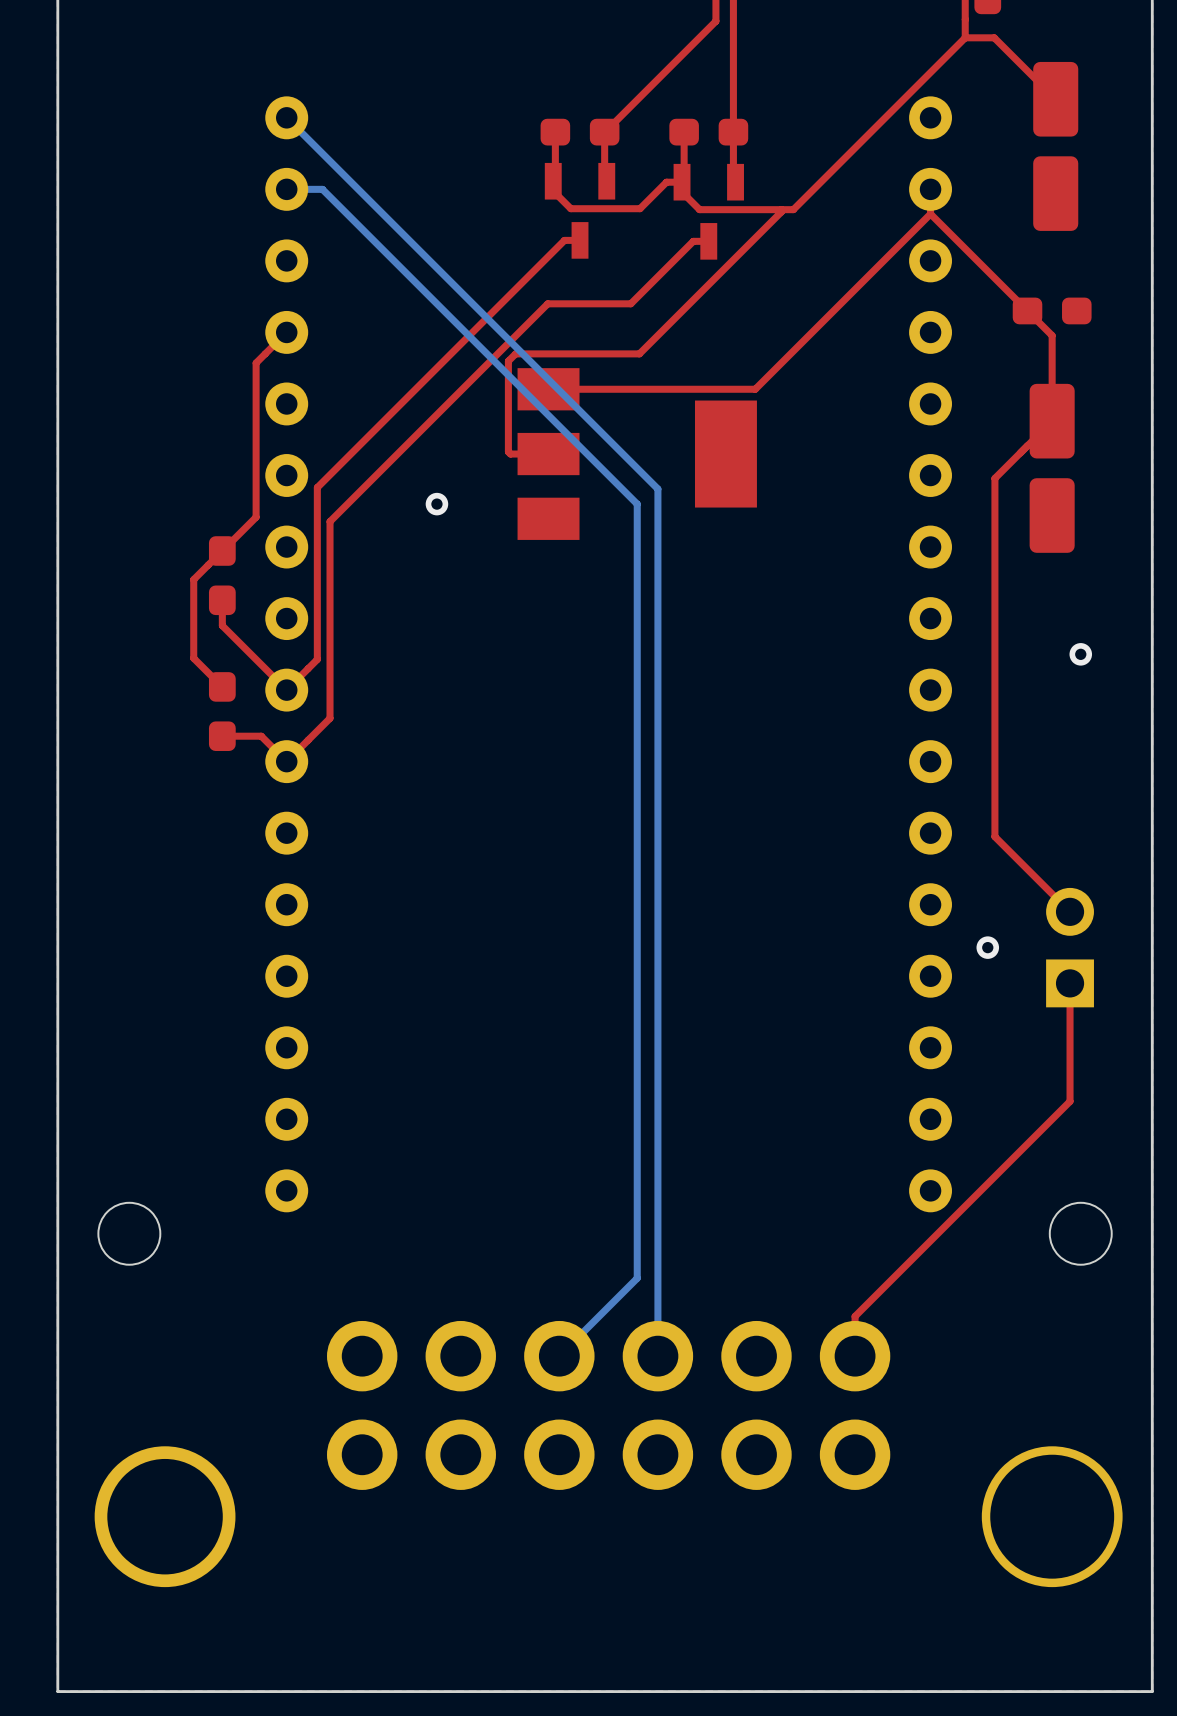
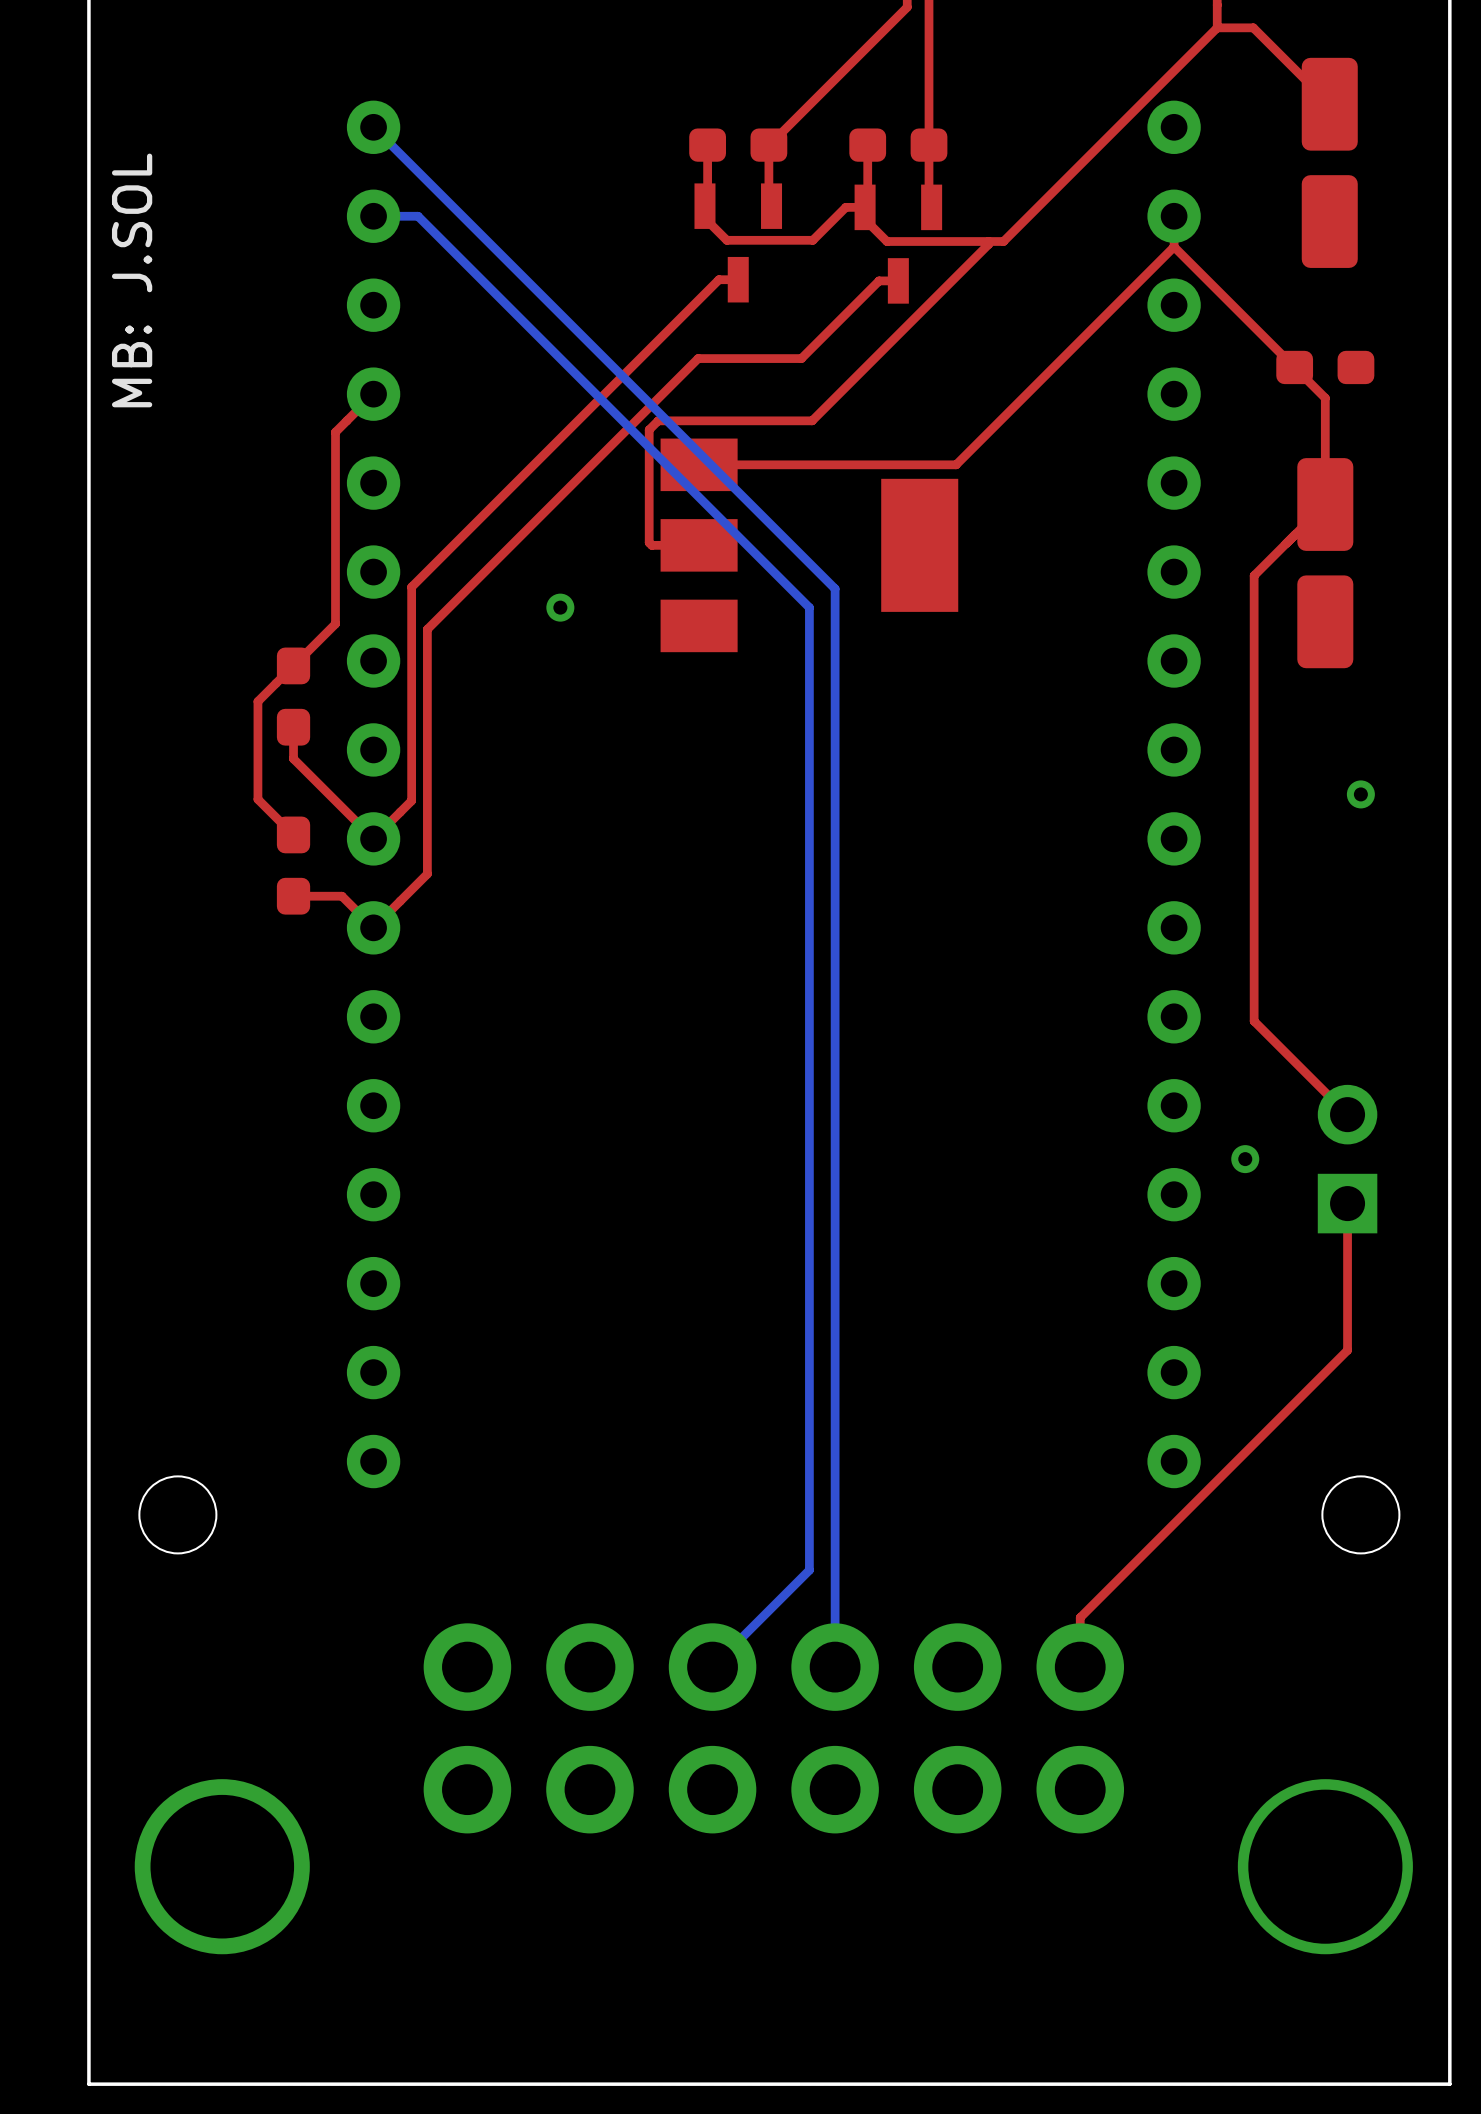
text: none -> MB: J.SOL (132, 280)

